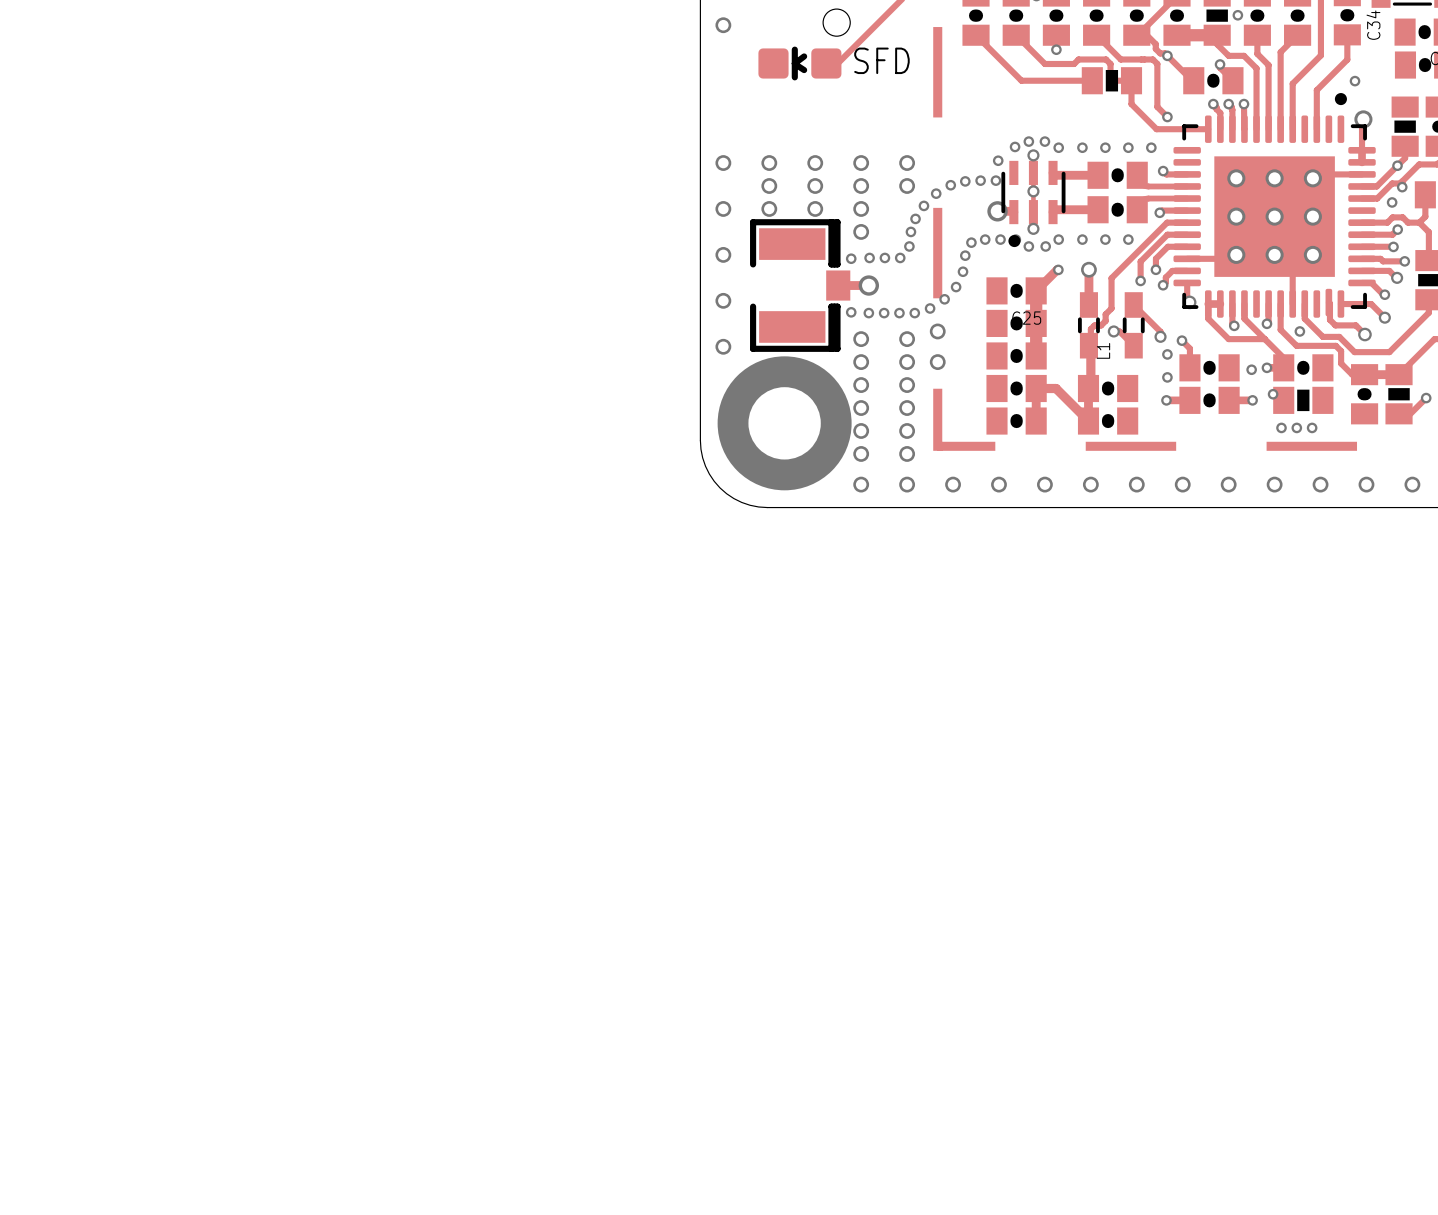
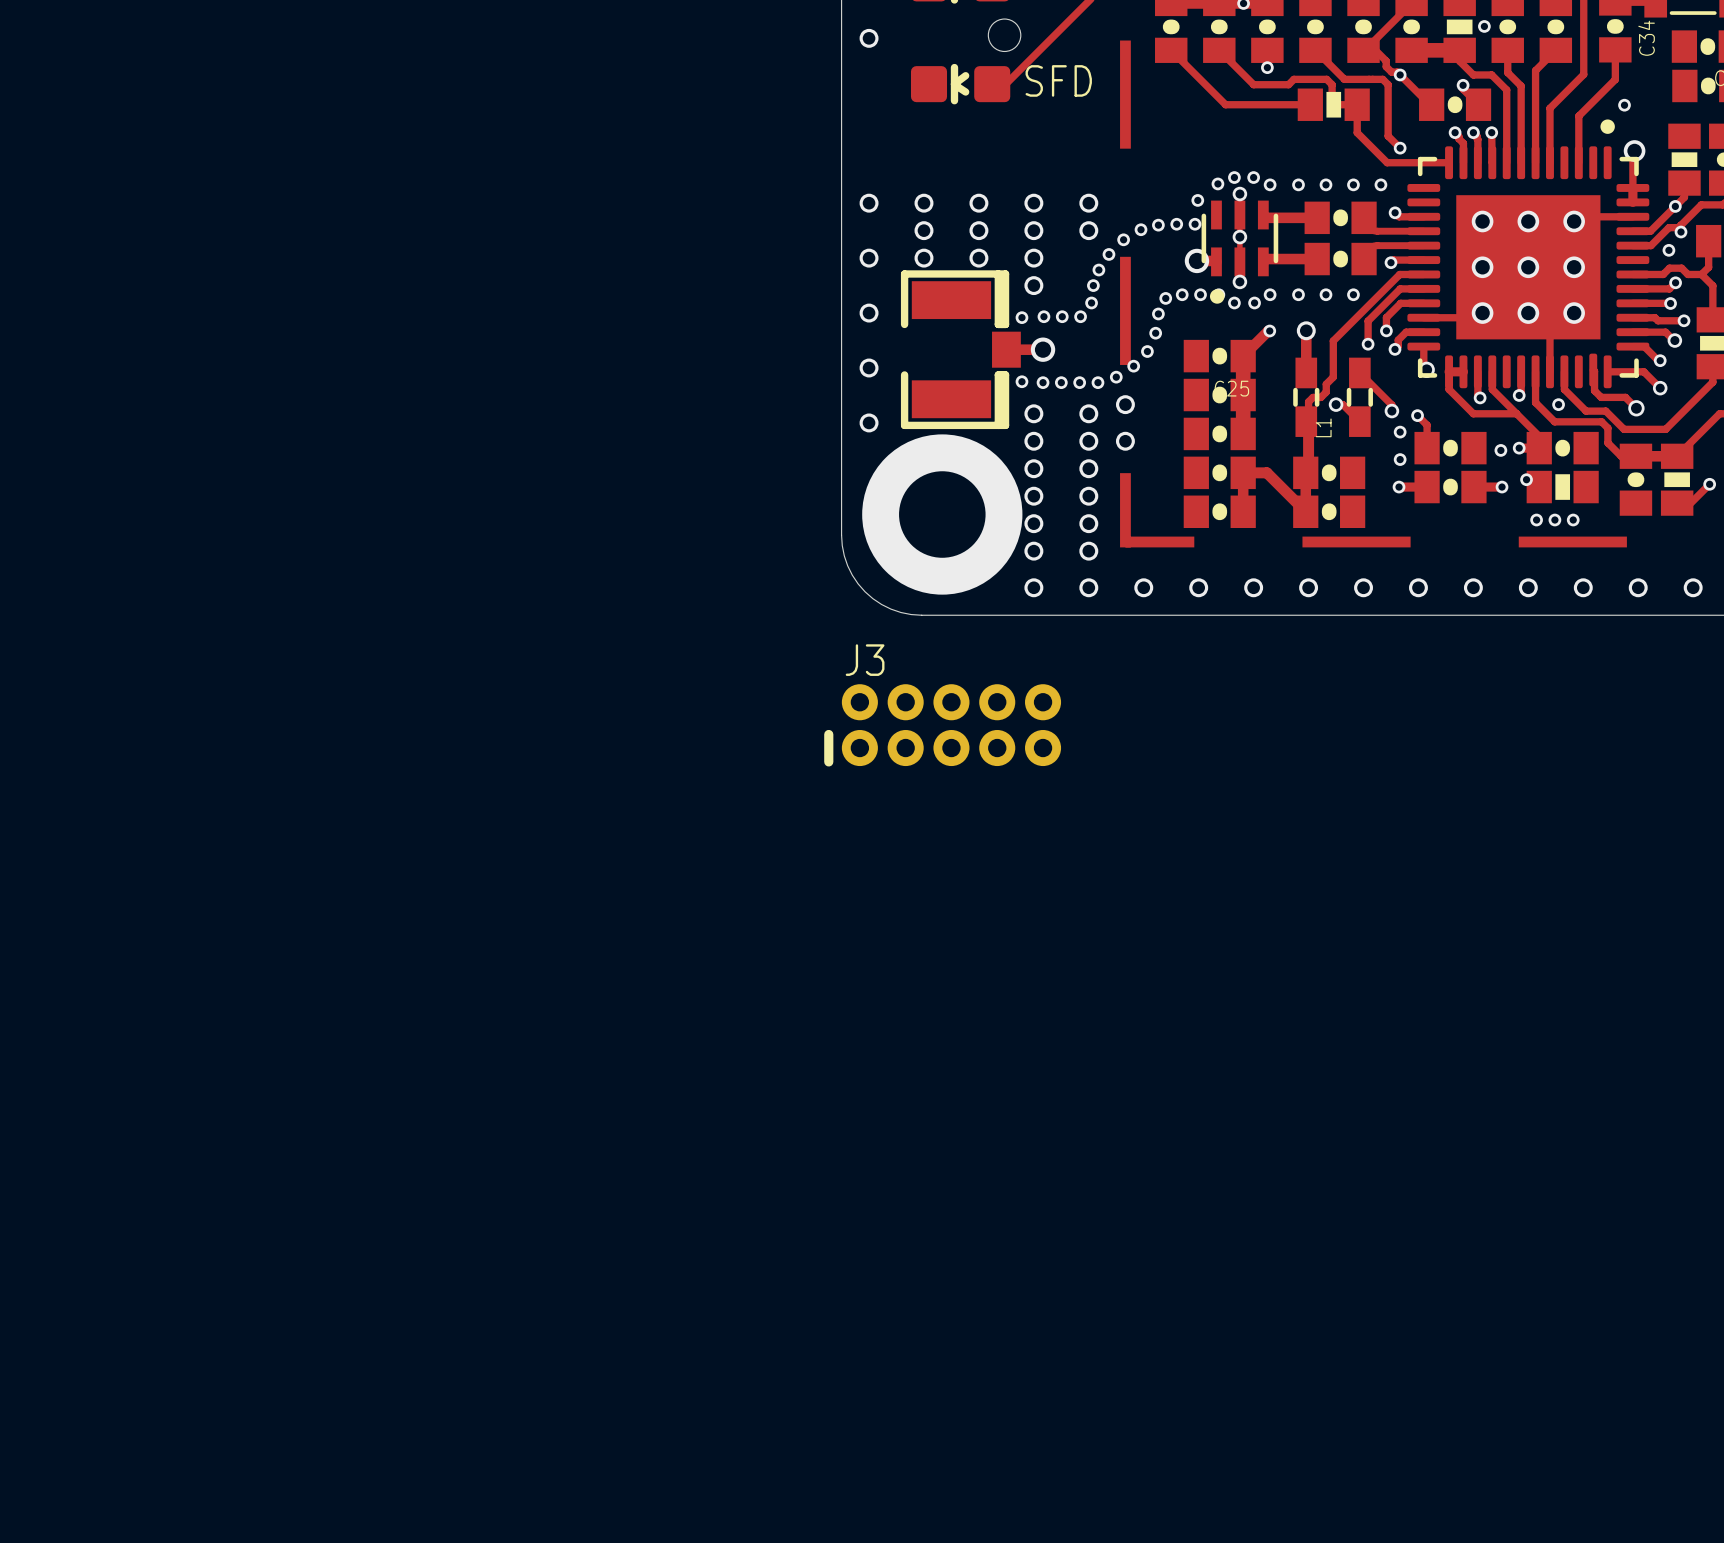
J3: none -> (942, 725)

